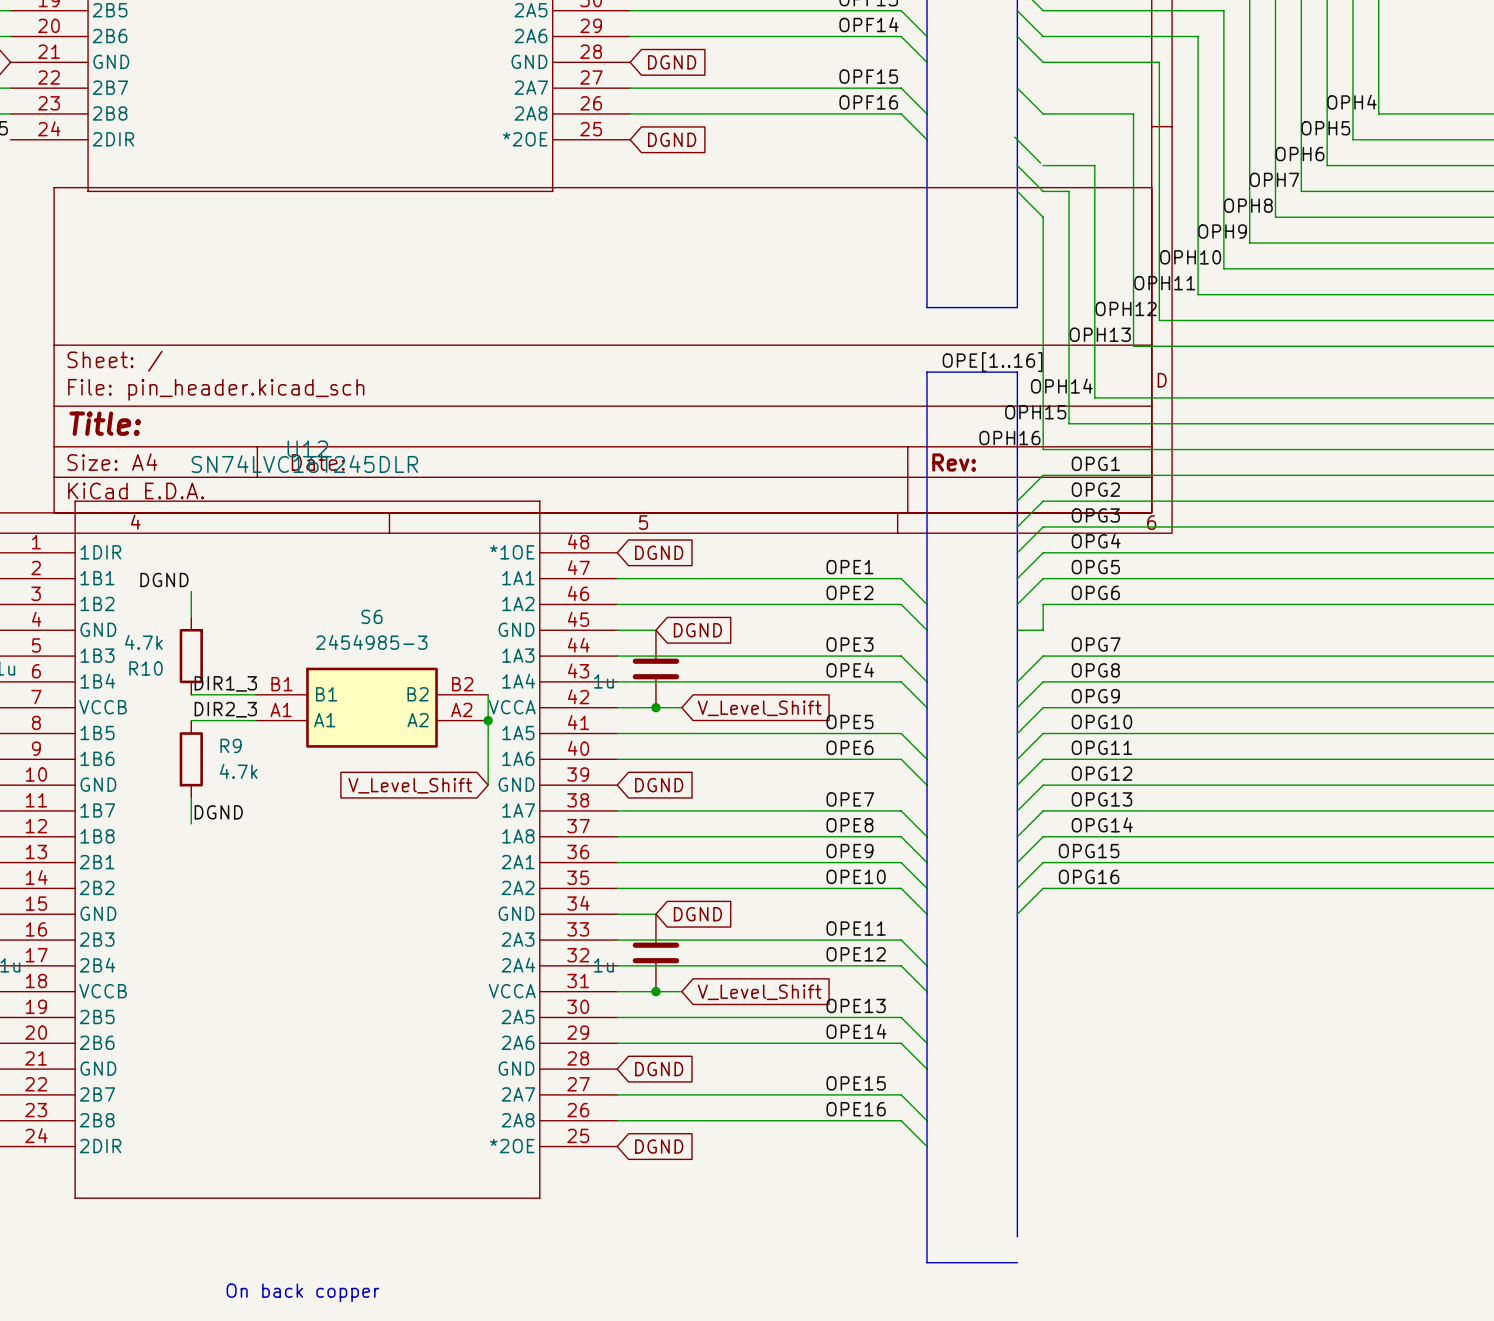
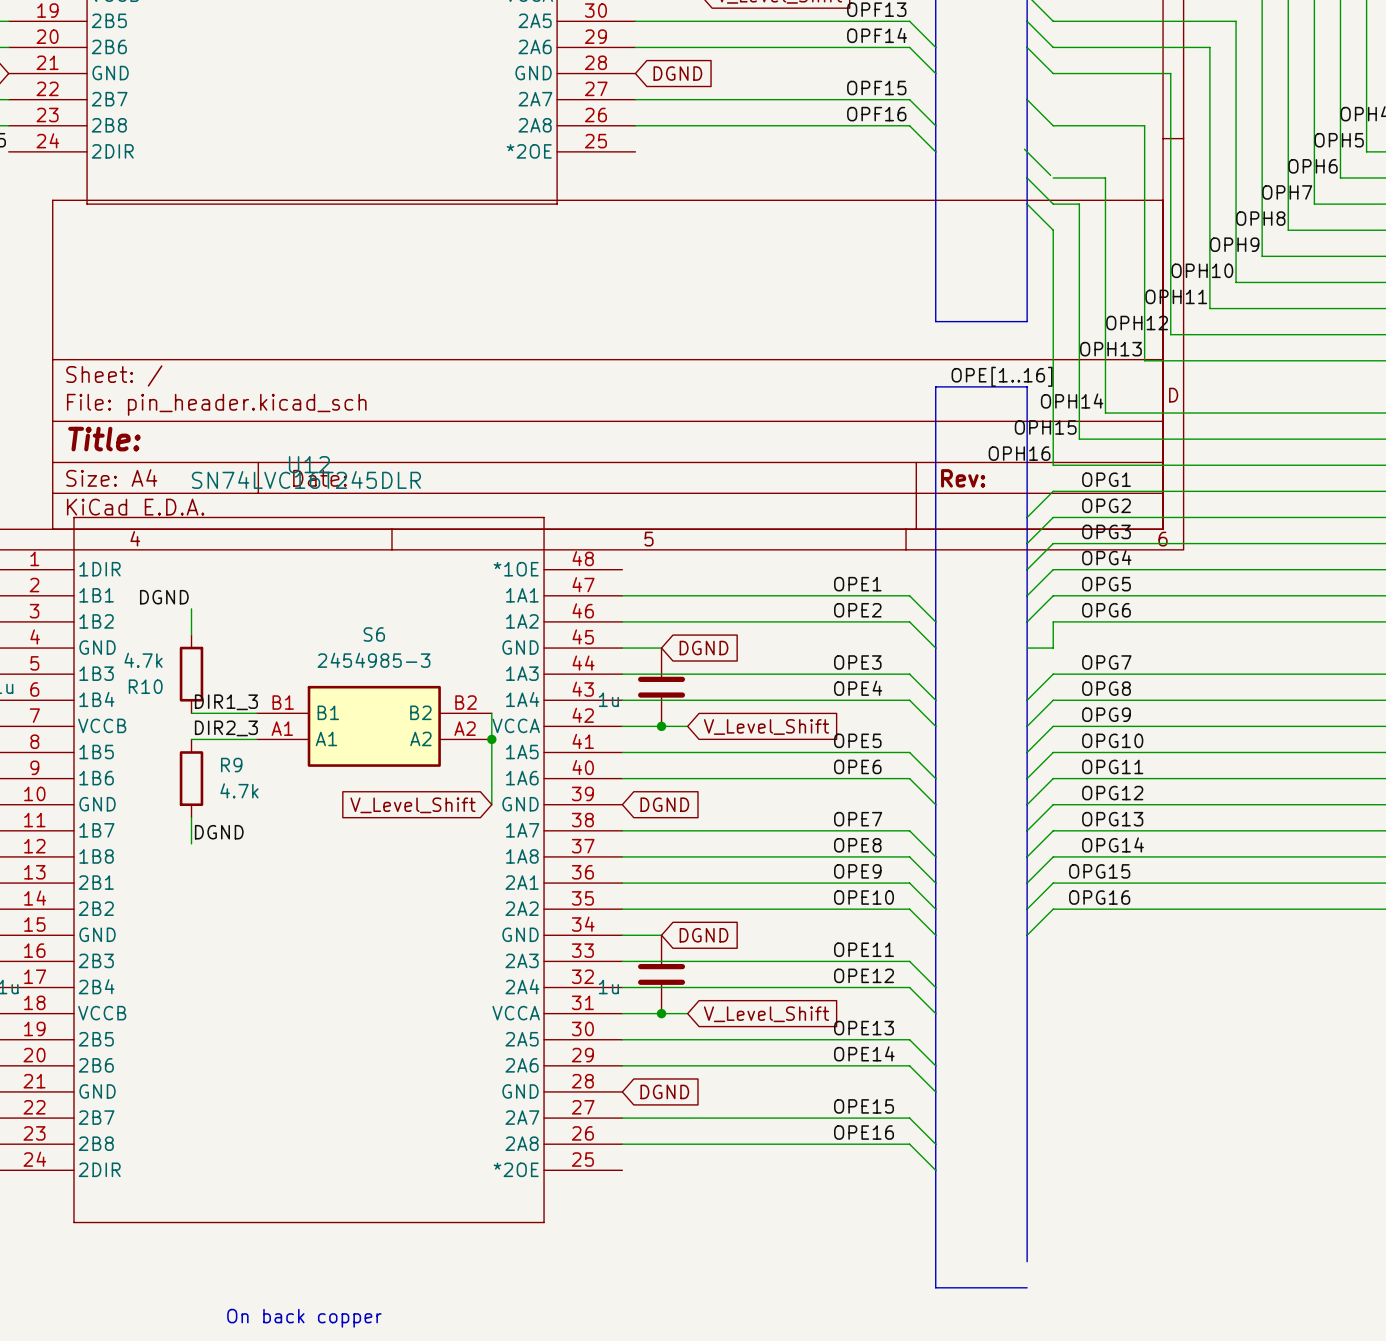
global label: DGND (672, 139) -> none
global label: DGND (659, 552) -> none
global label: DGND (659, 1146) -> none

